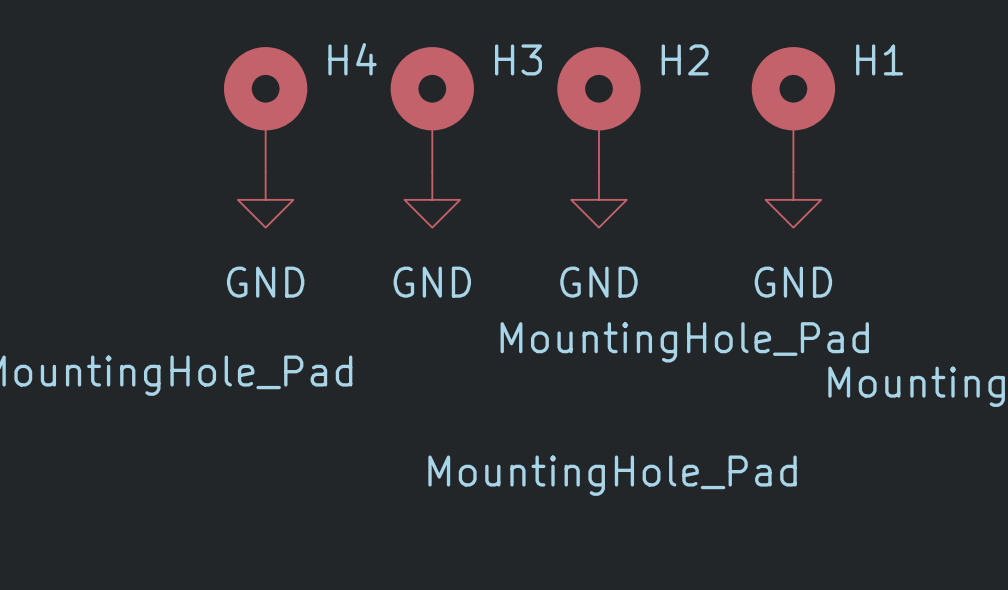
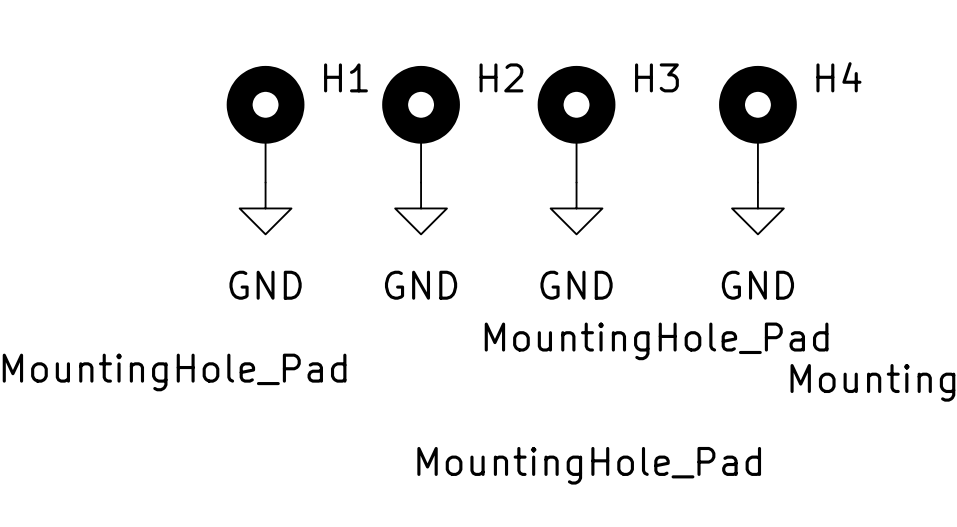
H4 name: H4 (352, 59) -> H1 (345, 77)
H3 name: H3 (518, 59) -> H2 (501, 77)
H2 name: H2 (685, 59) -> H3 (656, 77)
H1 name: H1 (879, 59) -> H4 (838, 77)

